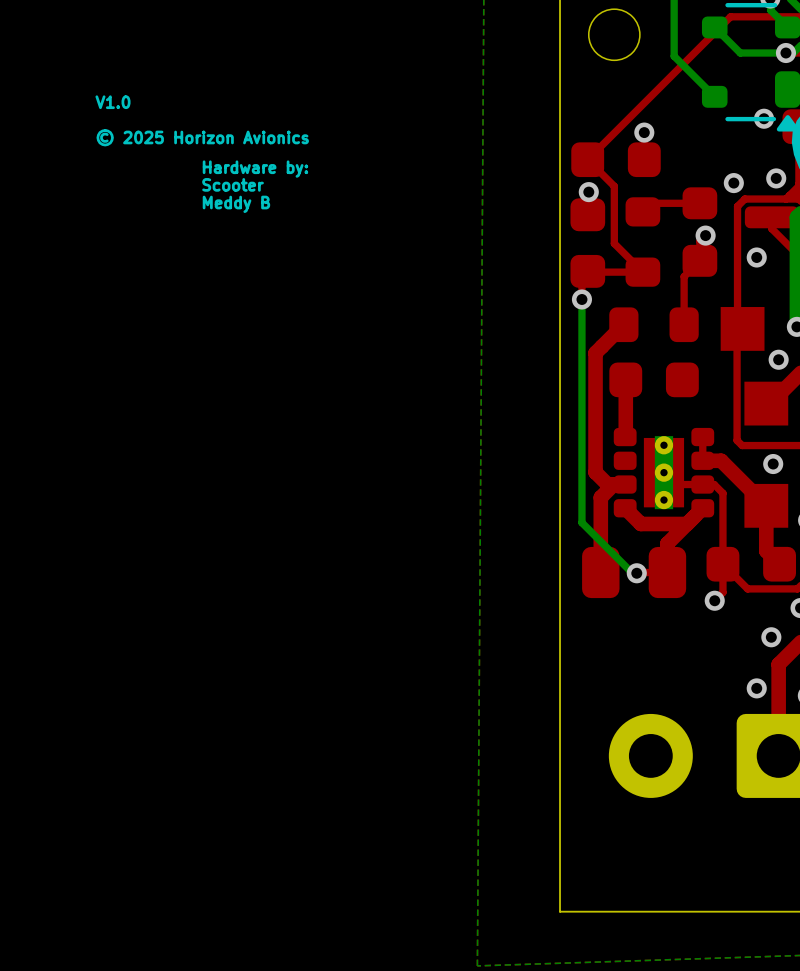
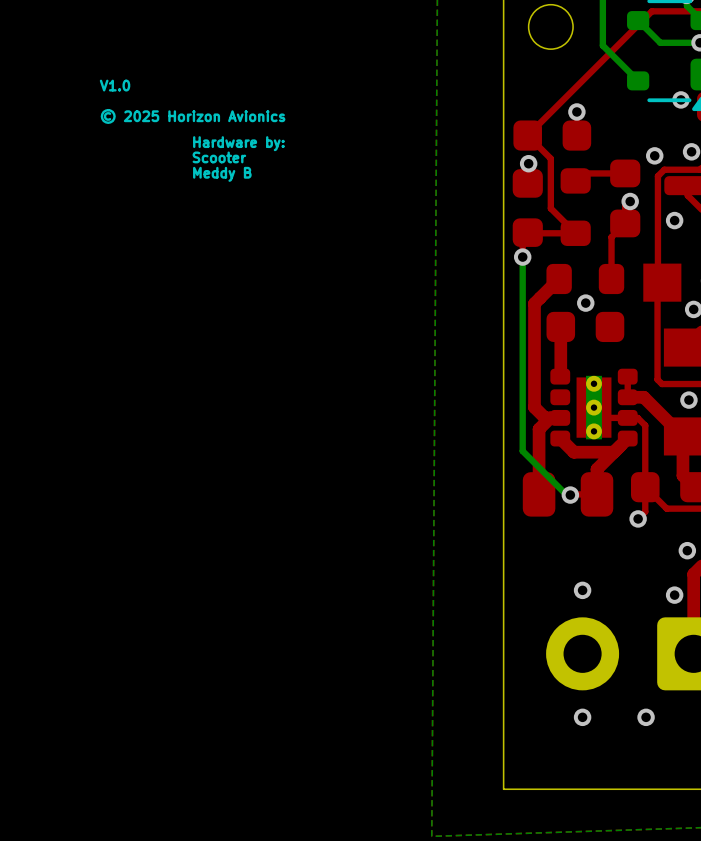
via: none -> (585, 303)
via: none -> (582, 590)
via: none -> (582, 717)
via: none -> (646, 717)

